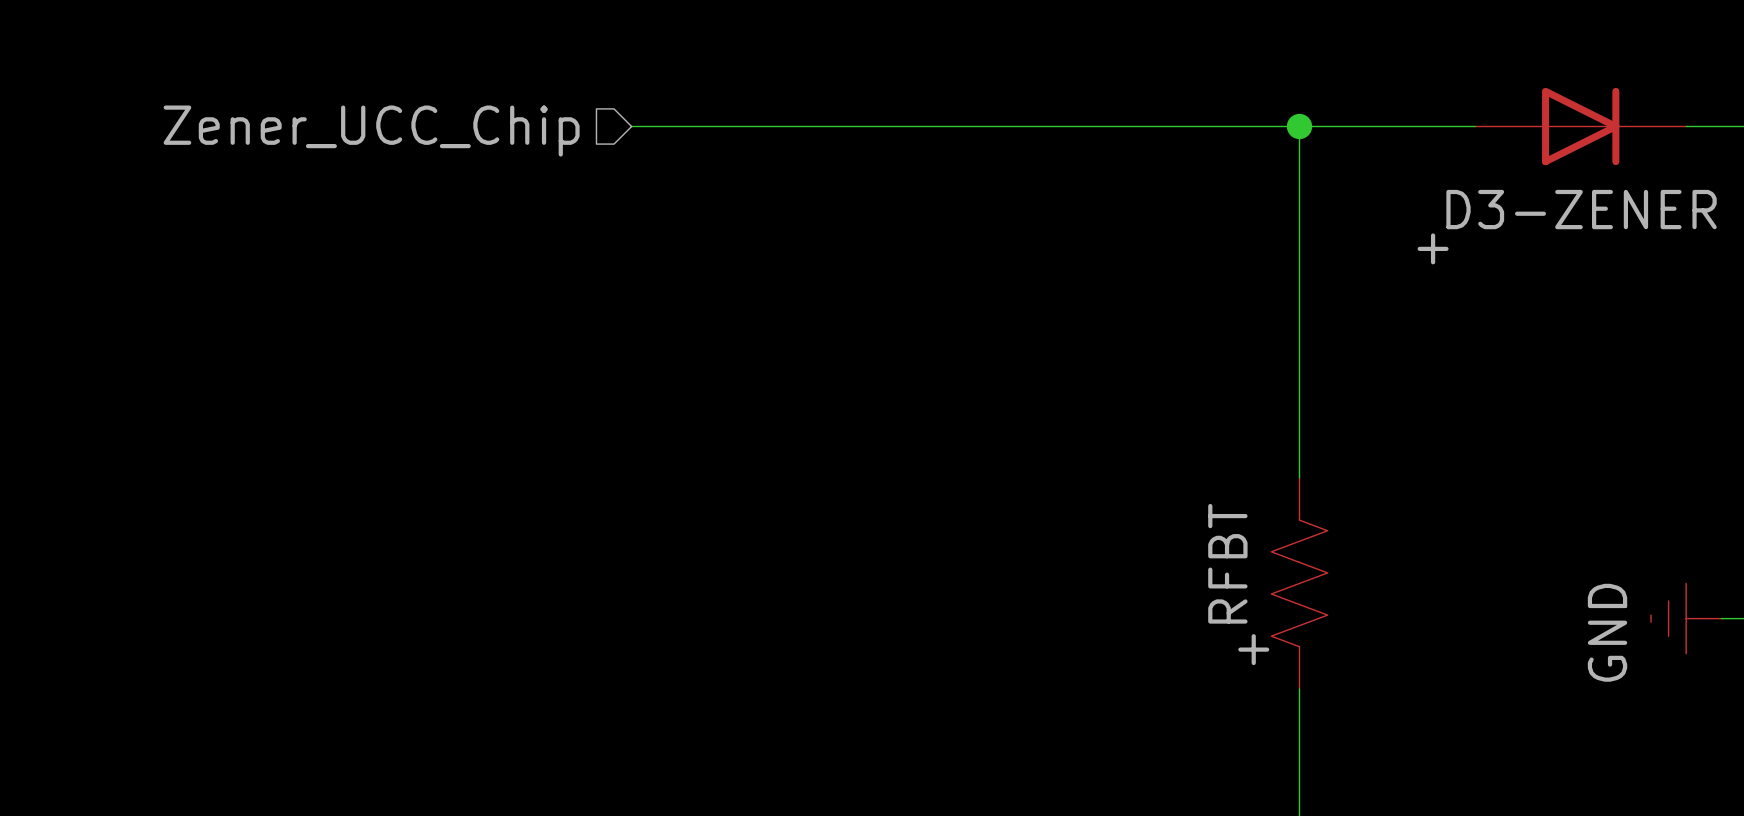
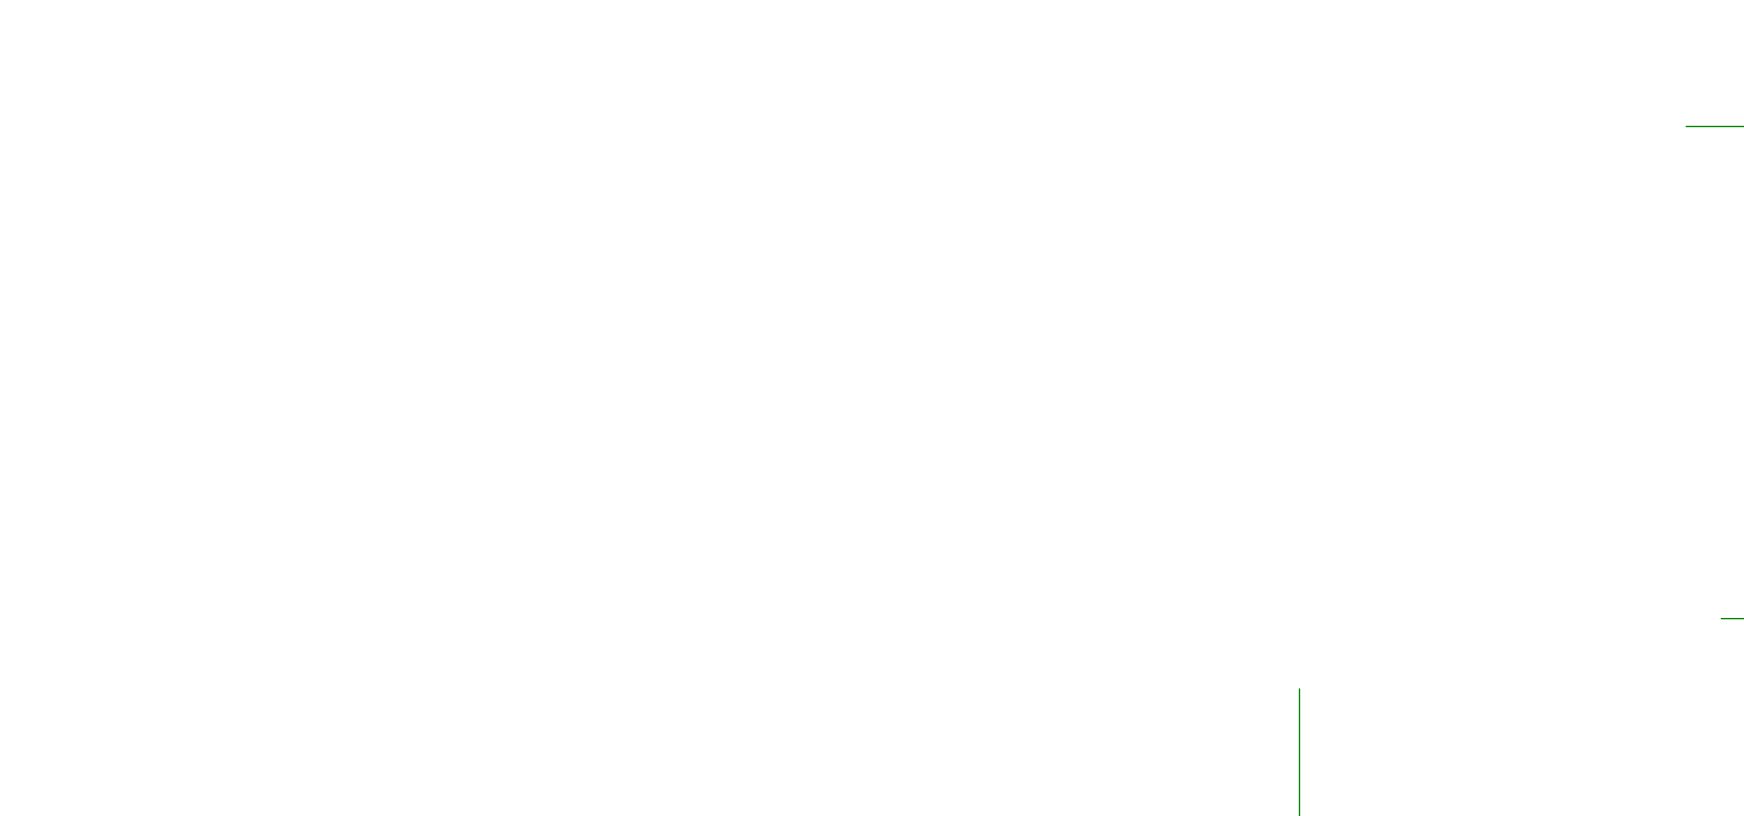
wire: (631, 126) (1475, 126) -> none
wire: (1299, 126) (1299, 478) -> none
junction: (1299, 126) -> none
part: D3-ZENER (1580, 126) -> none
hierarchical label: Zener_UCC_Chip (371, 131) -> none
part: RFBT (1299, 583) -> none
power symbol: GND (1686, 618) -> none

